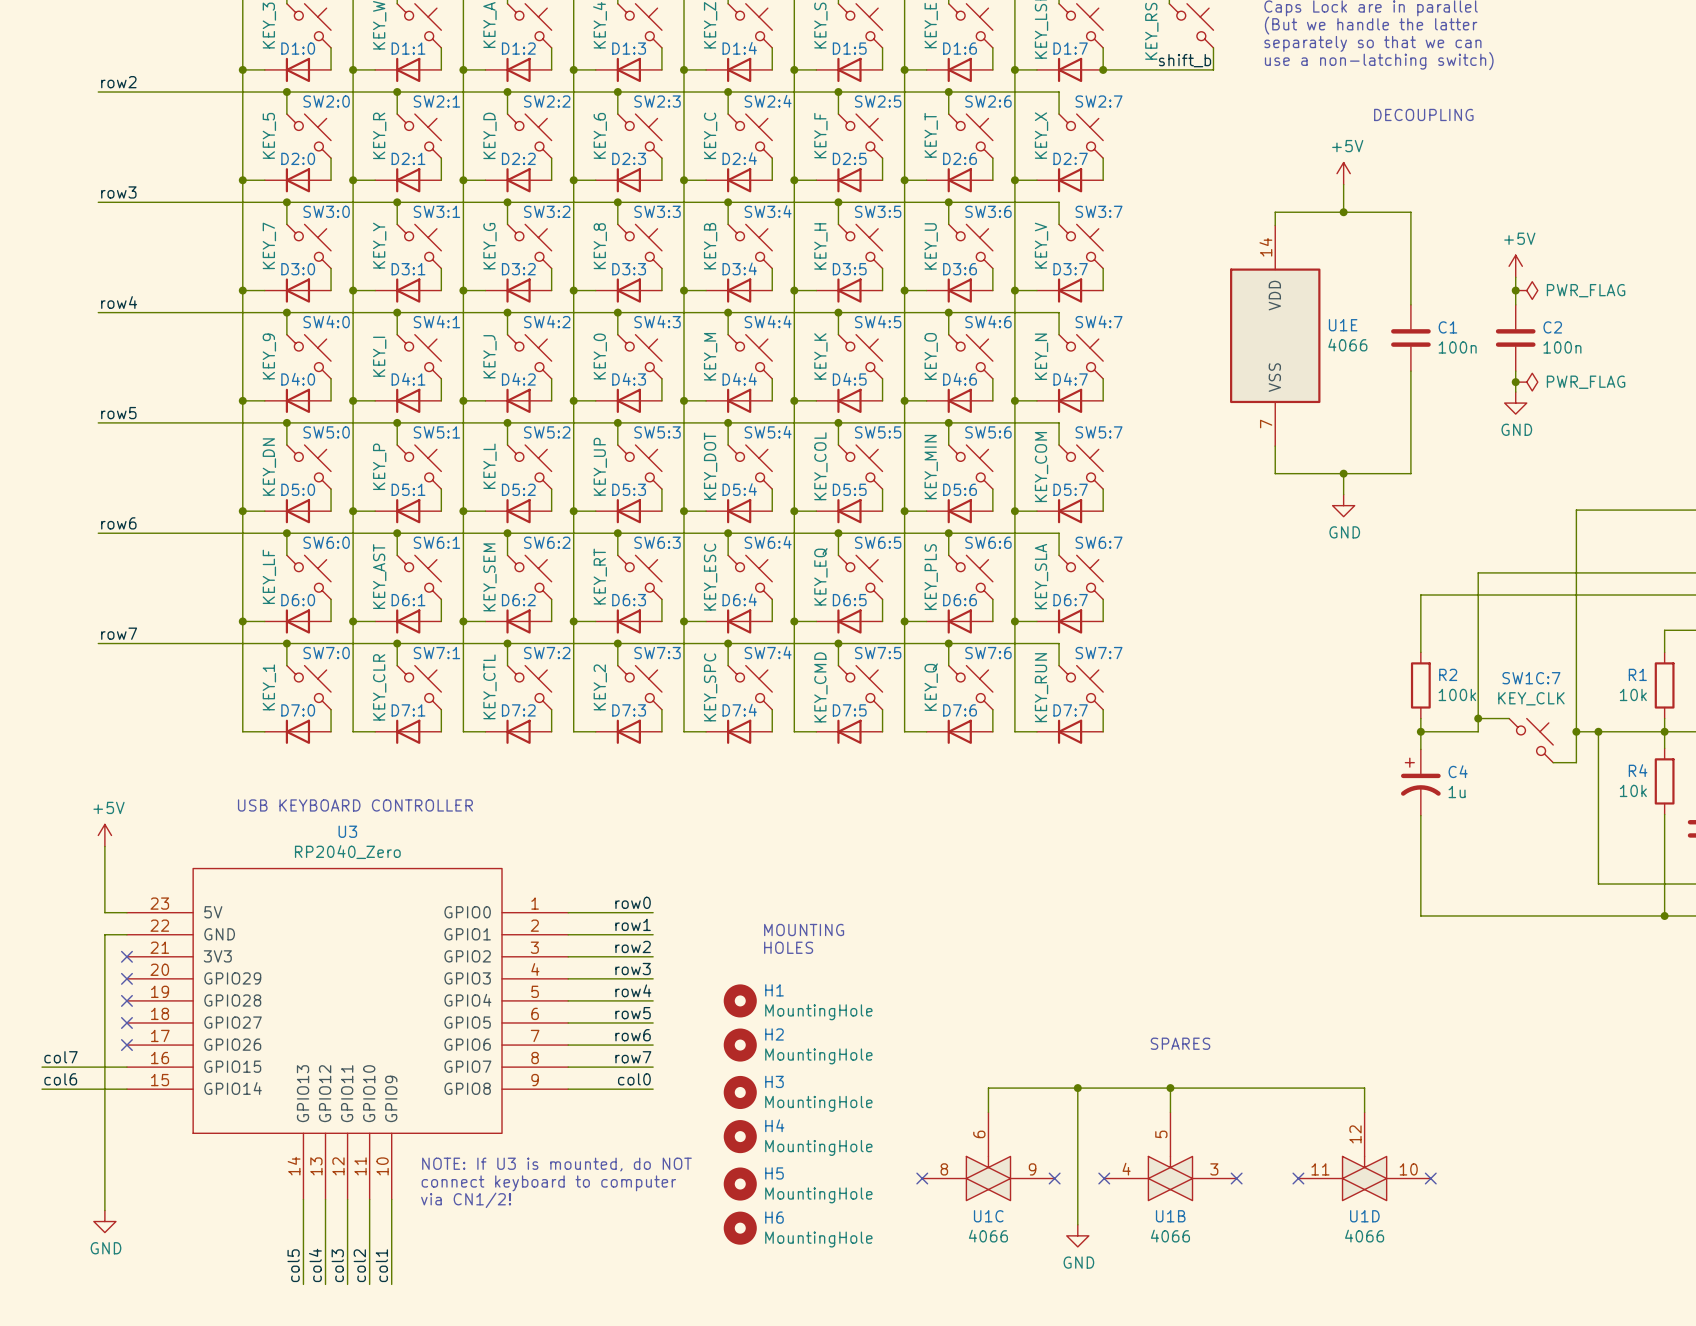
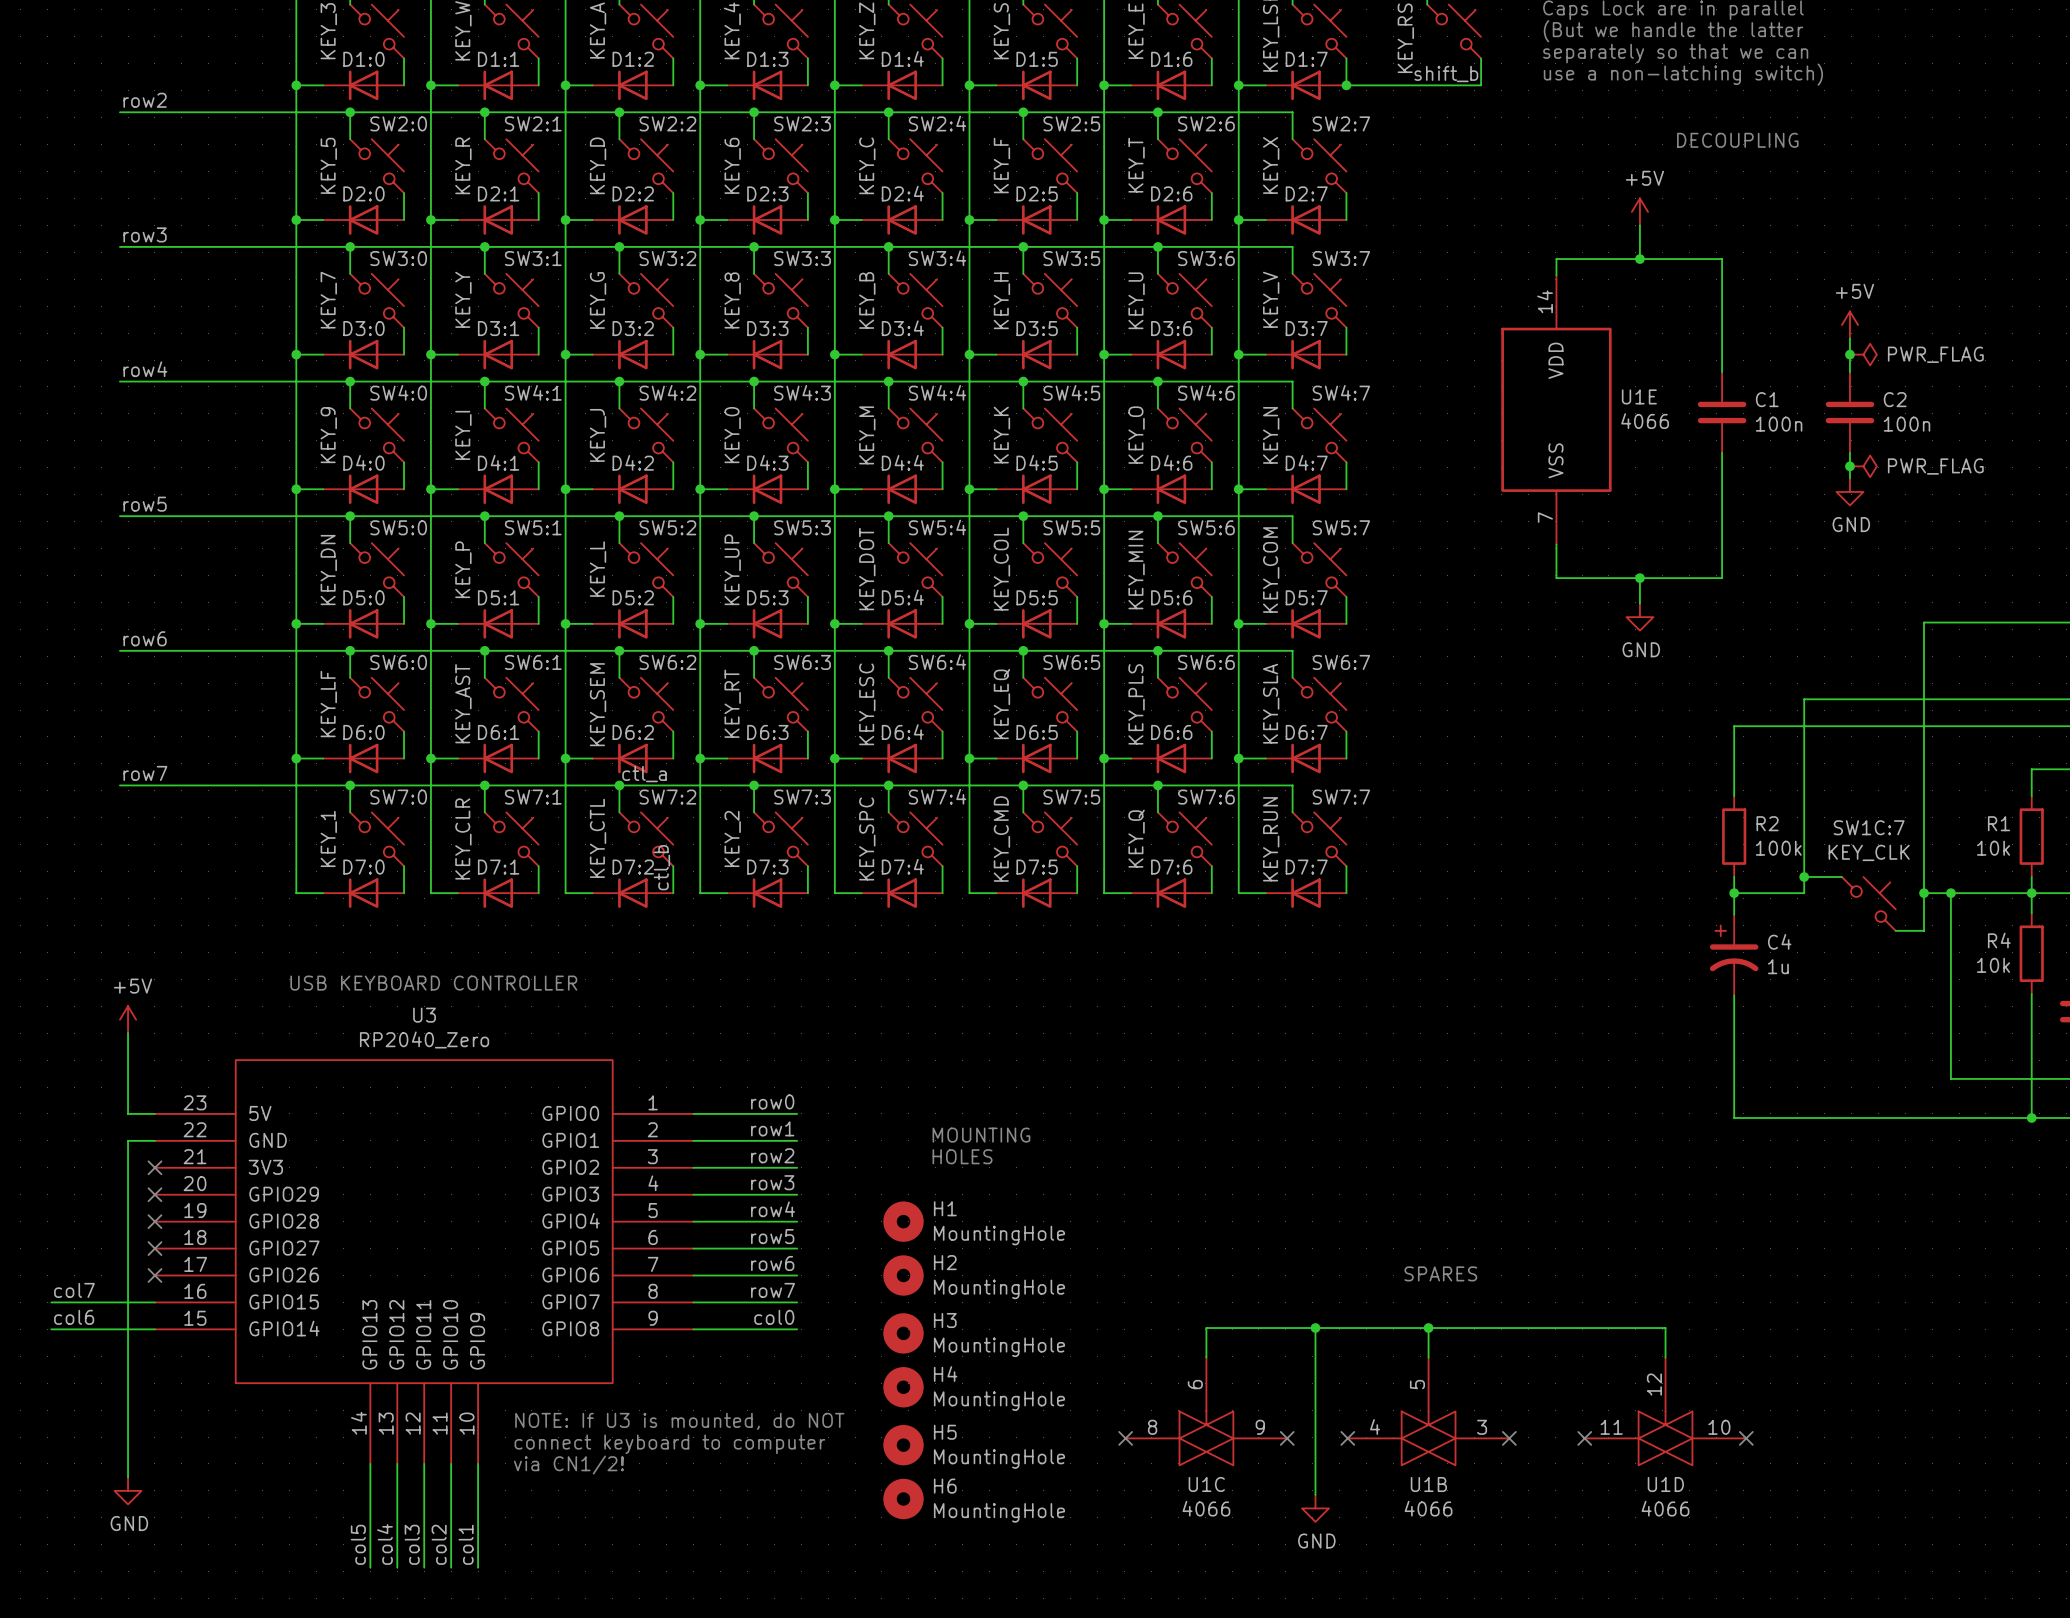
label: none -> ctl_a (644, 774)
label: none -> ctl_b (661, 867)

